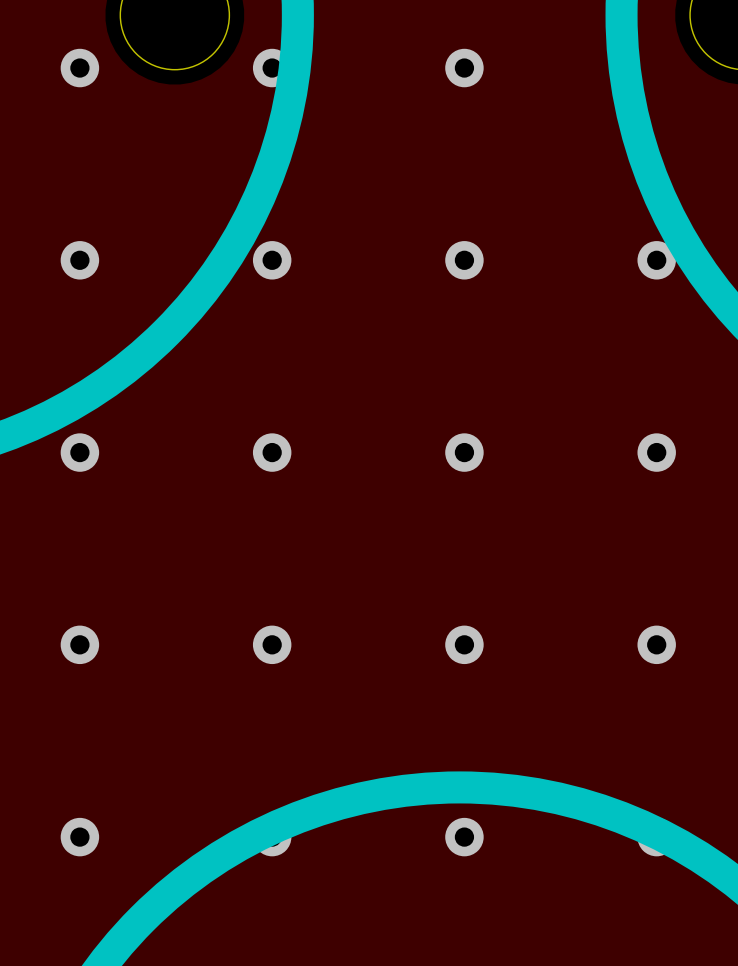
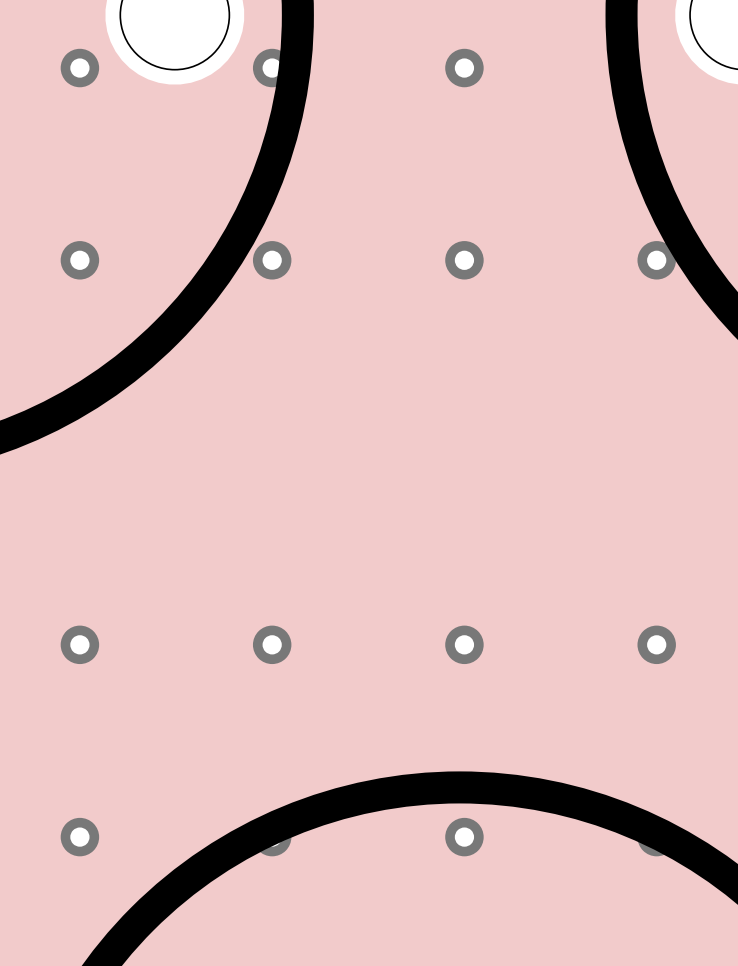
via: (79, 452) -> none
via: (272, 452) -> none
via: (464, 452) -> none
via: (656, 452) -> none

